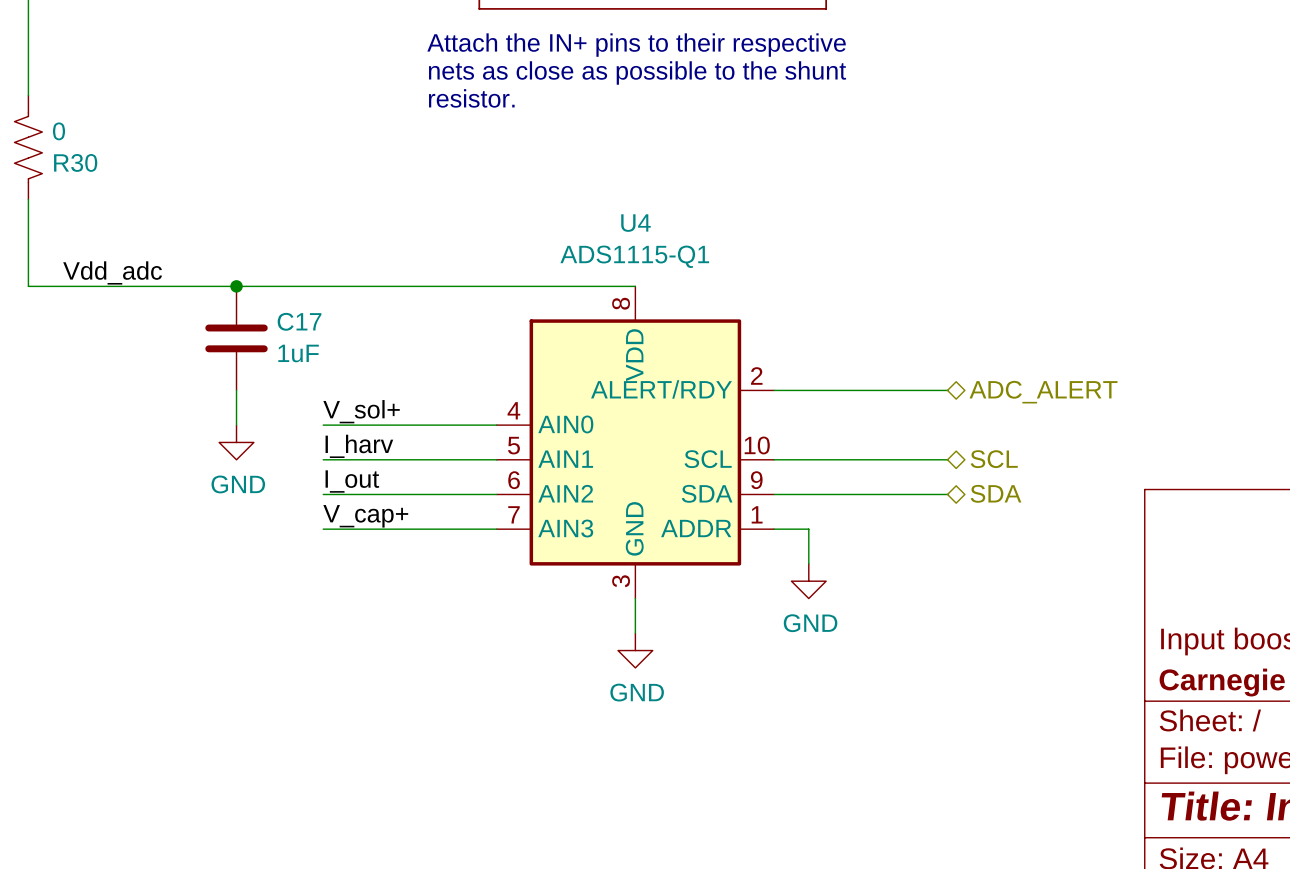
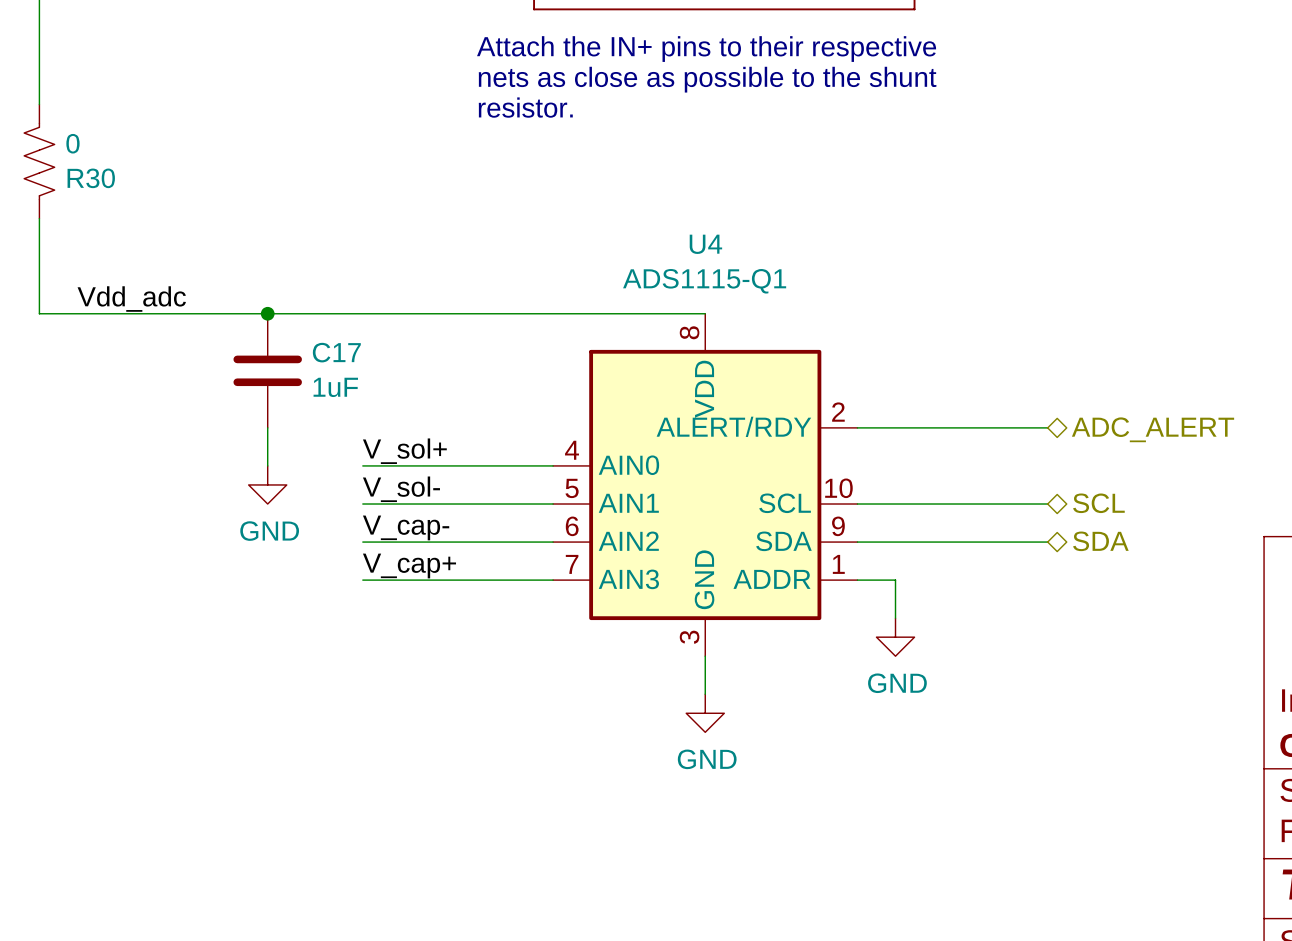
label: I_harv (359, 446) -> V_sol- (401, 489)
label: I_out (352, 481) -> V_cap- (406, 527)

